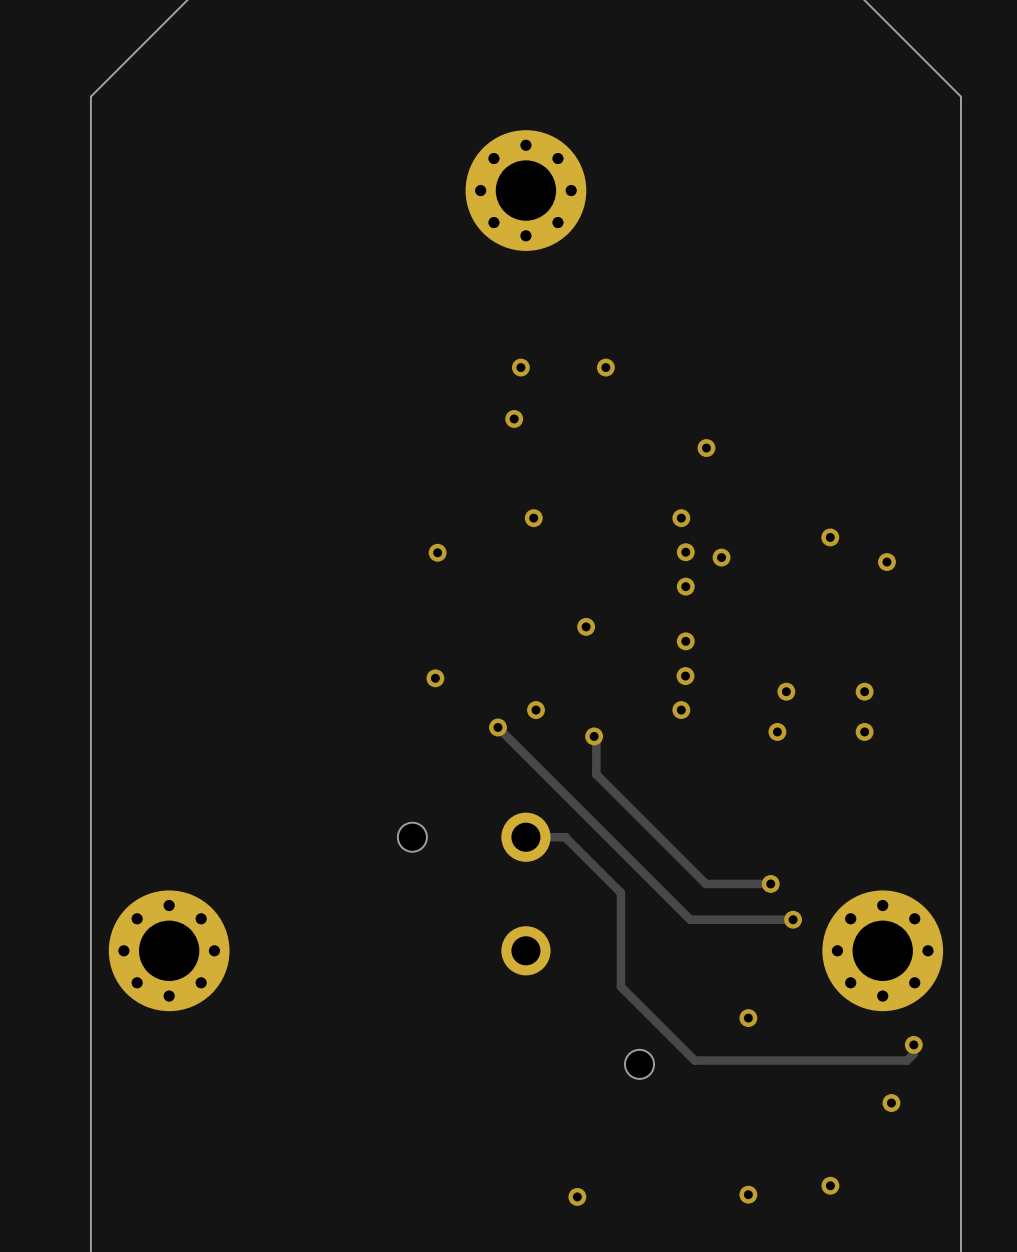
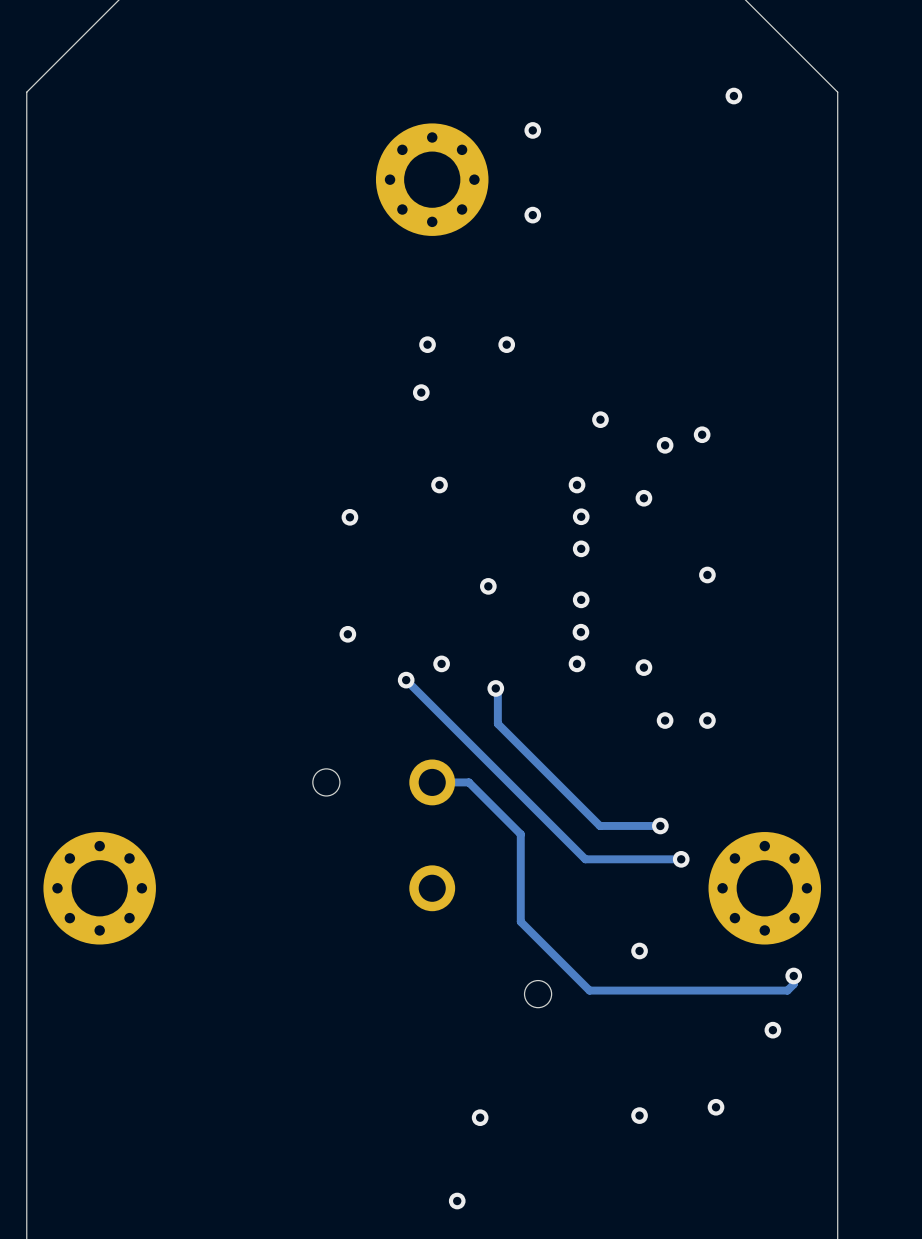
via: none -> (733, 96)
via: none -> (532, 130)
via: none -> (532, 215)
via: none -> (702, 434)
via: none -> (665, 445)
via: none -> (643, 498)
via: (830, 537) -> none
via: (721, 557) -> none
via: (886, 562) -> none
via: none -> (707, 574)
via: (786, 691) -> none
via: (864, 691) -> none
via: none -> (643, 667)
via: (777, 731) -> none
via: (864, 731) -> none
via: none -> (665, 720)
via: none -> (707, 720)

